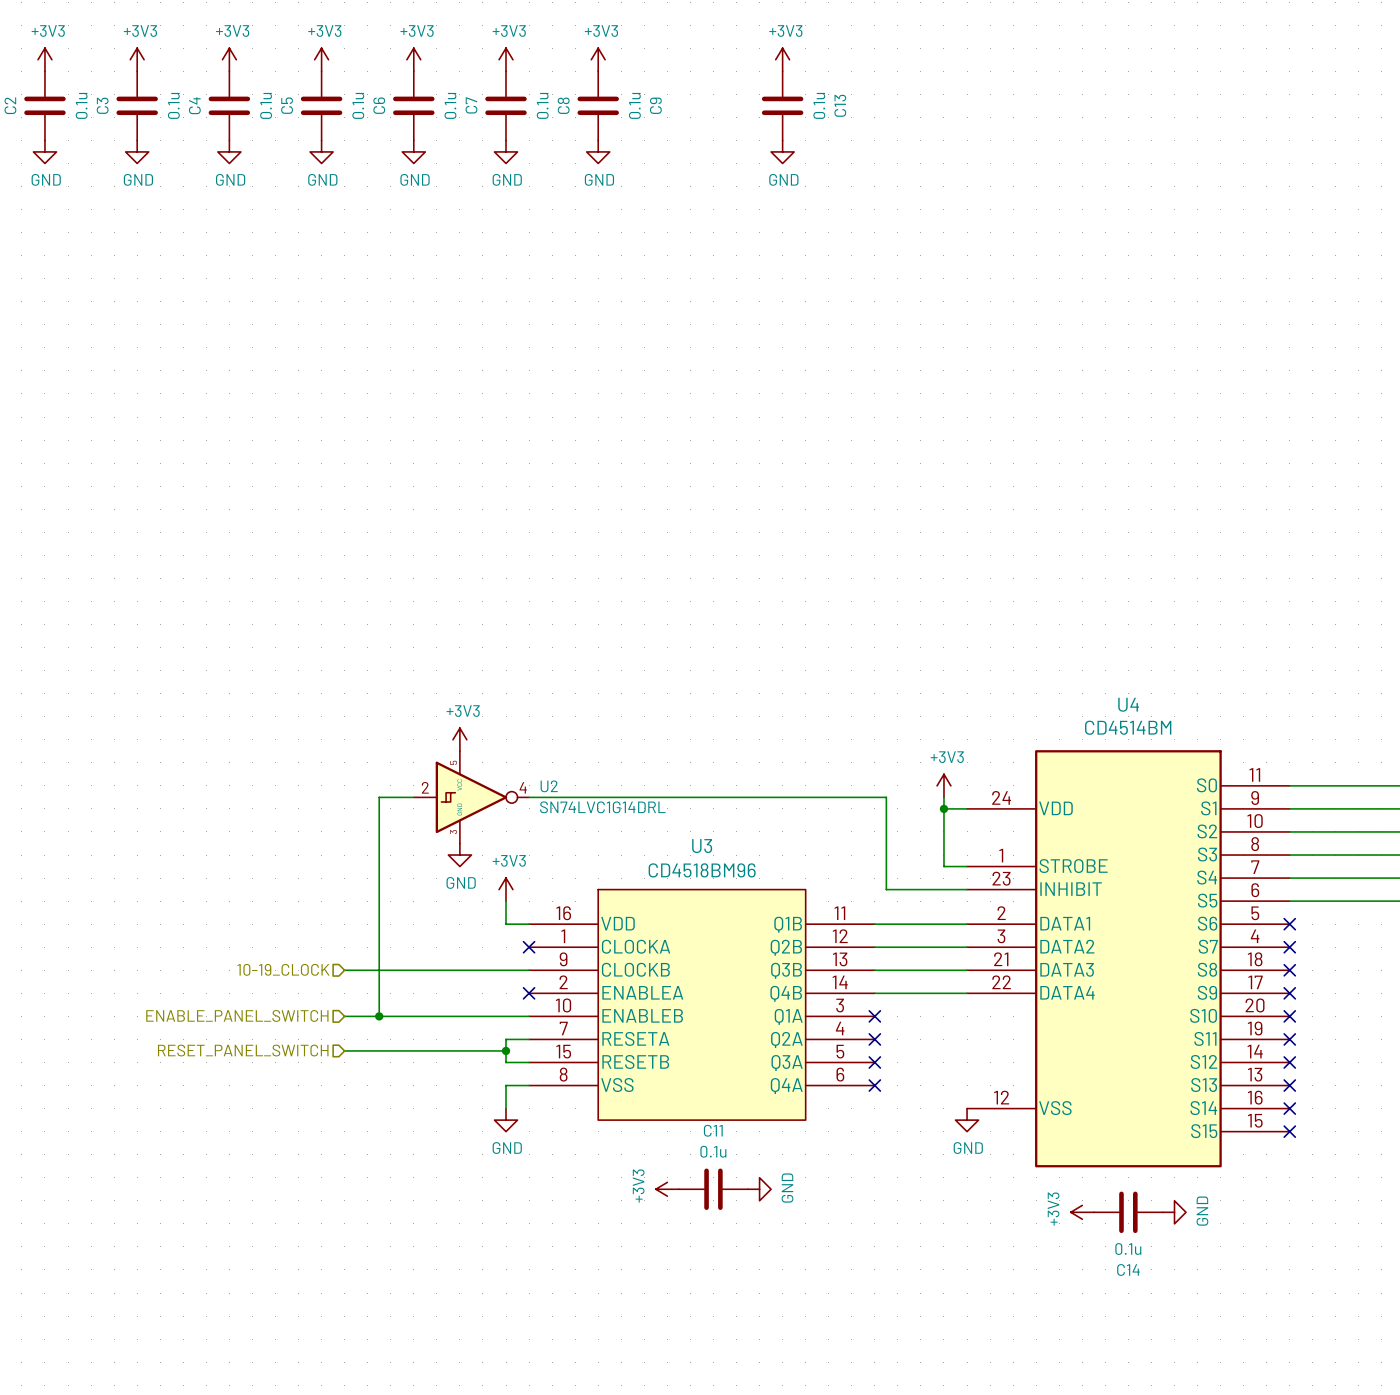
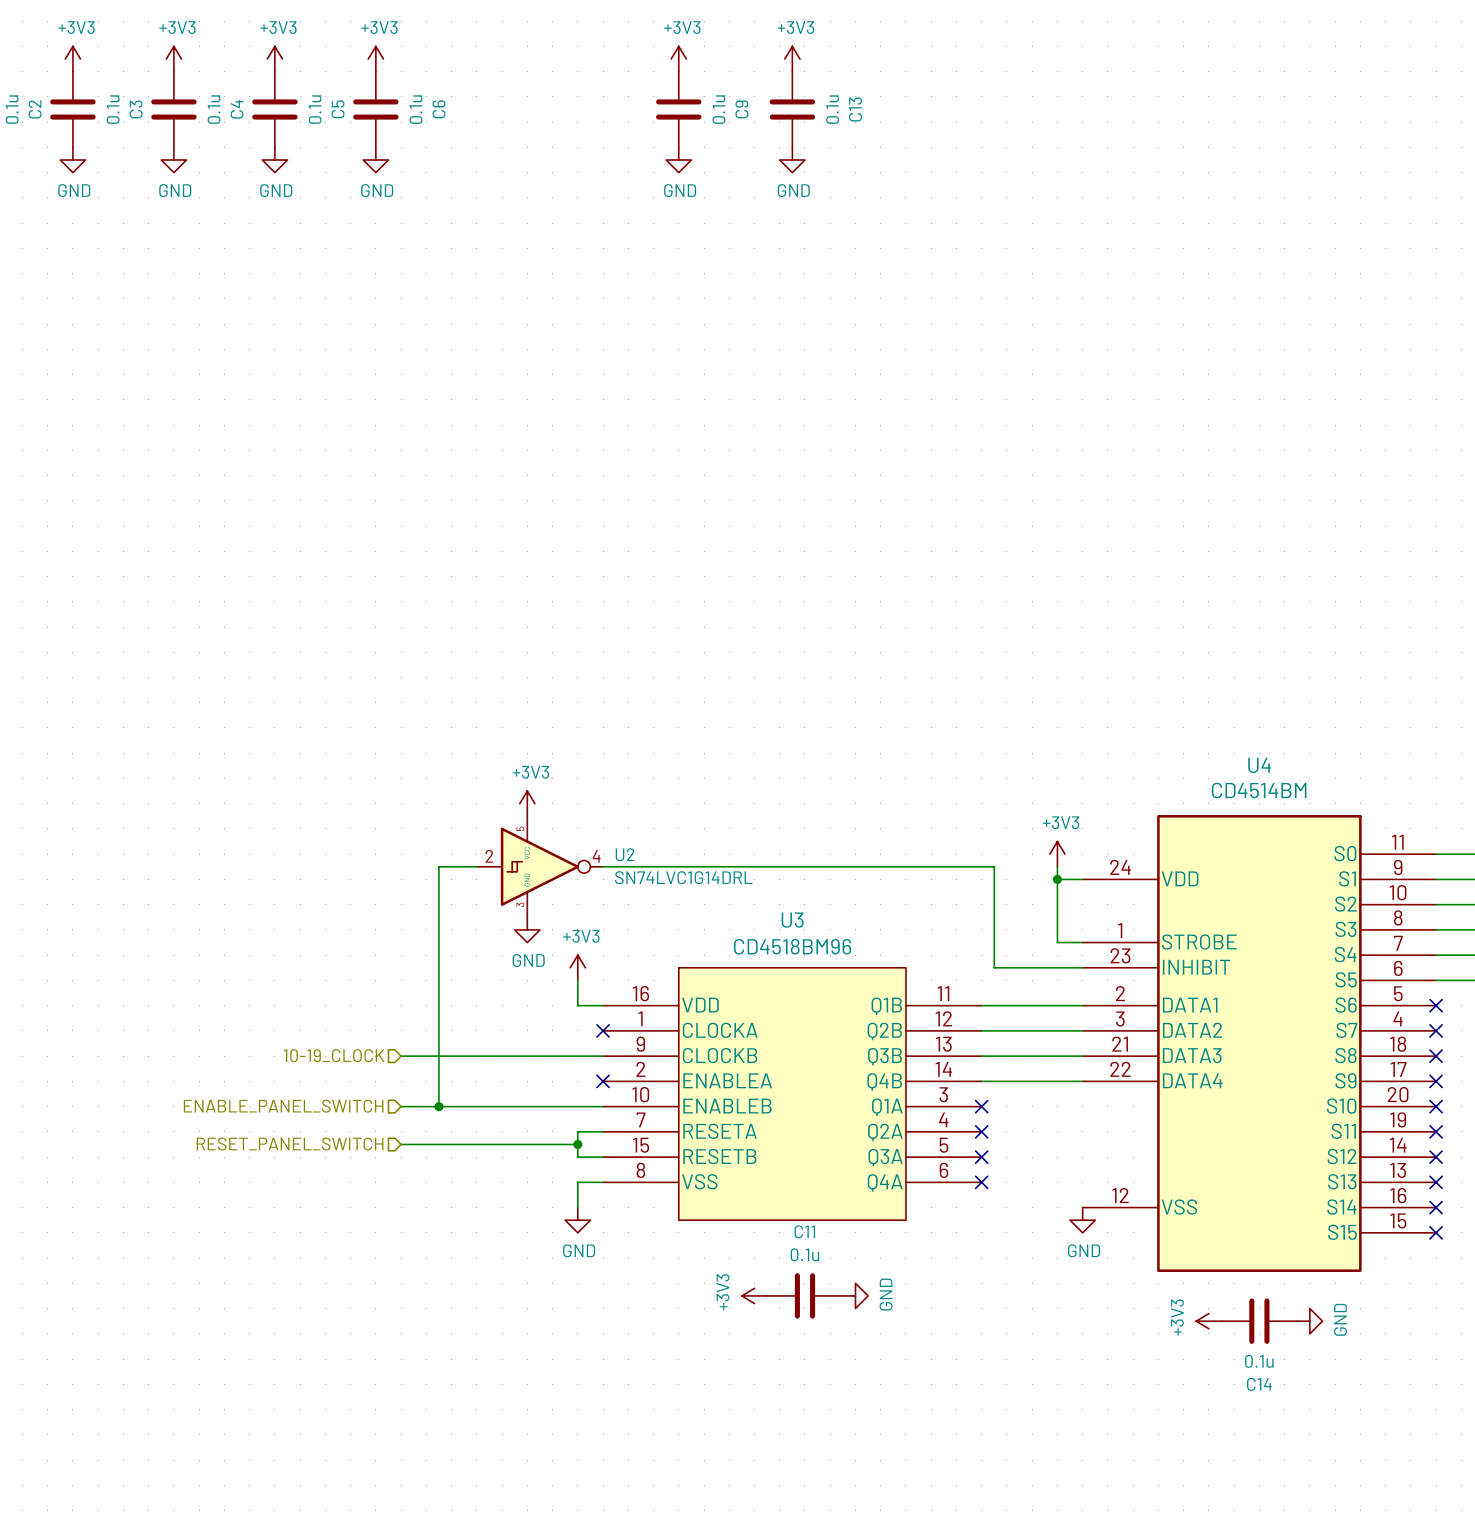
power symbol: +3V3 (413, 59) -> none
power symbol: +3V3 (506, 59) -> none
power symbol position: +3V3 (782, 59) -> +3V3 (792, 59)
C7: 0.1u (413, 105) -> none
C8: 0.1u (506, 105) -> none
C13 position: (782, 105) -> (792, 109)
power symbol: GND (413, 151) -> none
power symbol: GND (506, 151) -> none
power symbol position: GND (782, 151) -> GND (792, 159)

